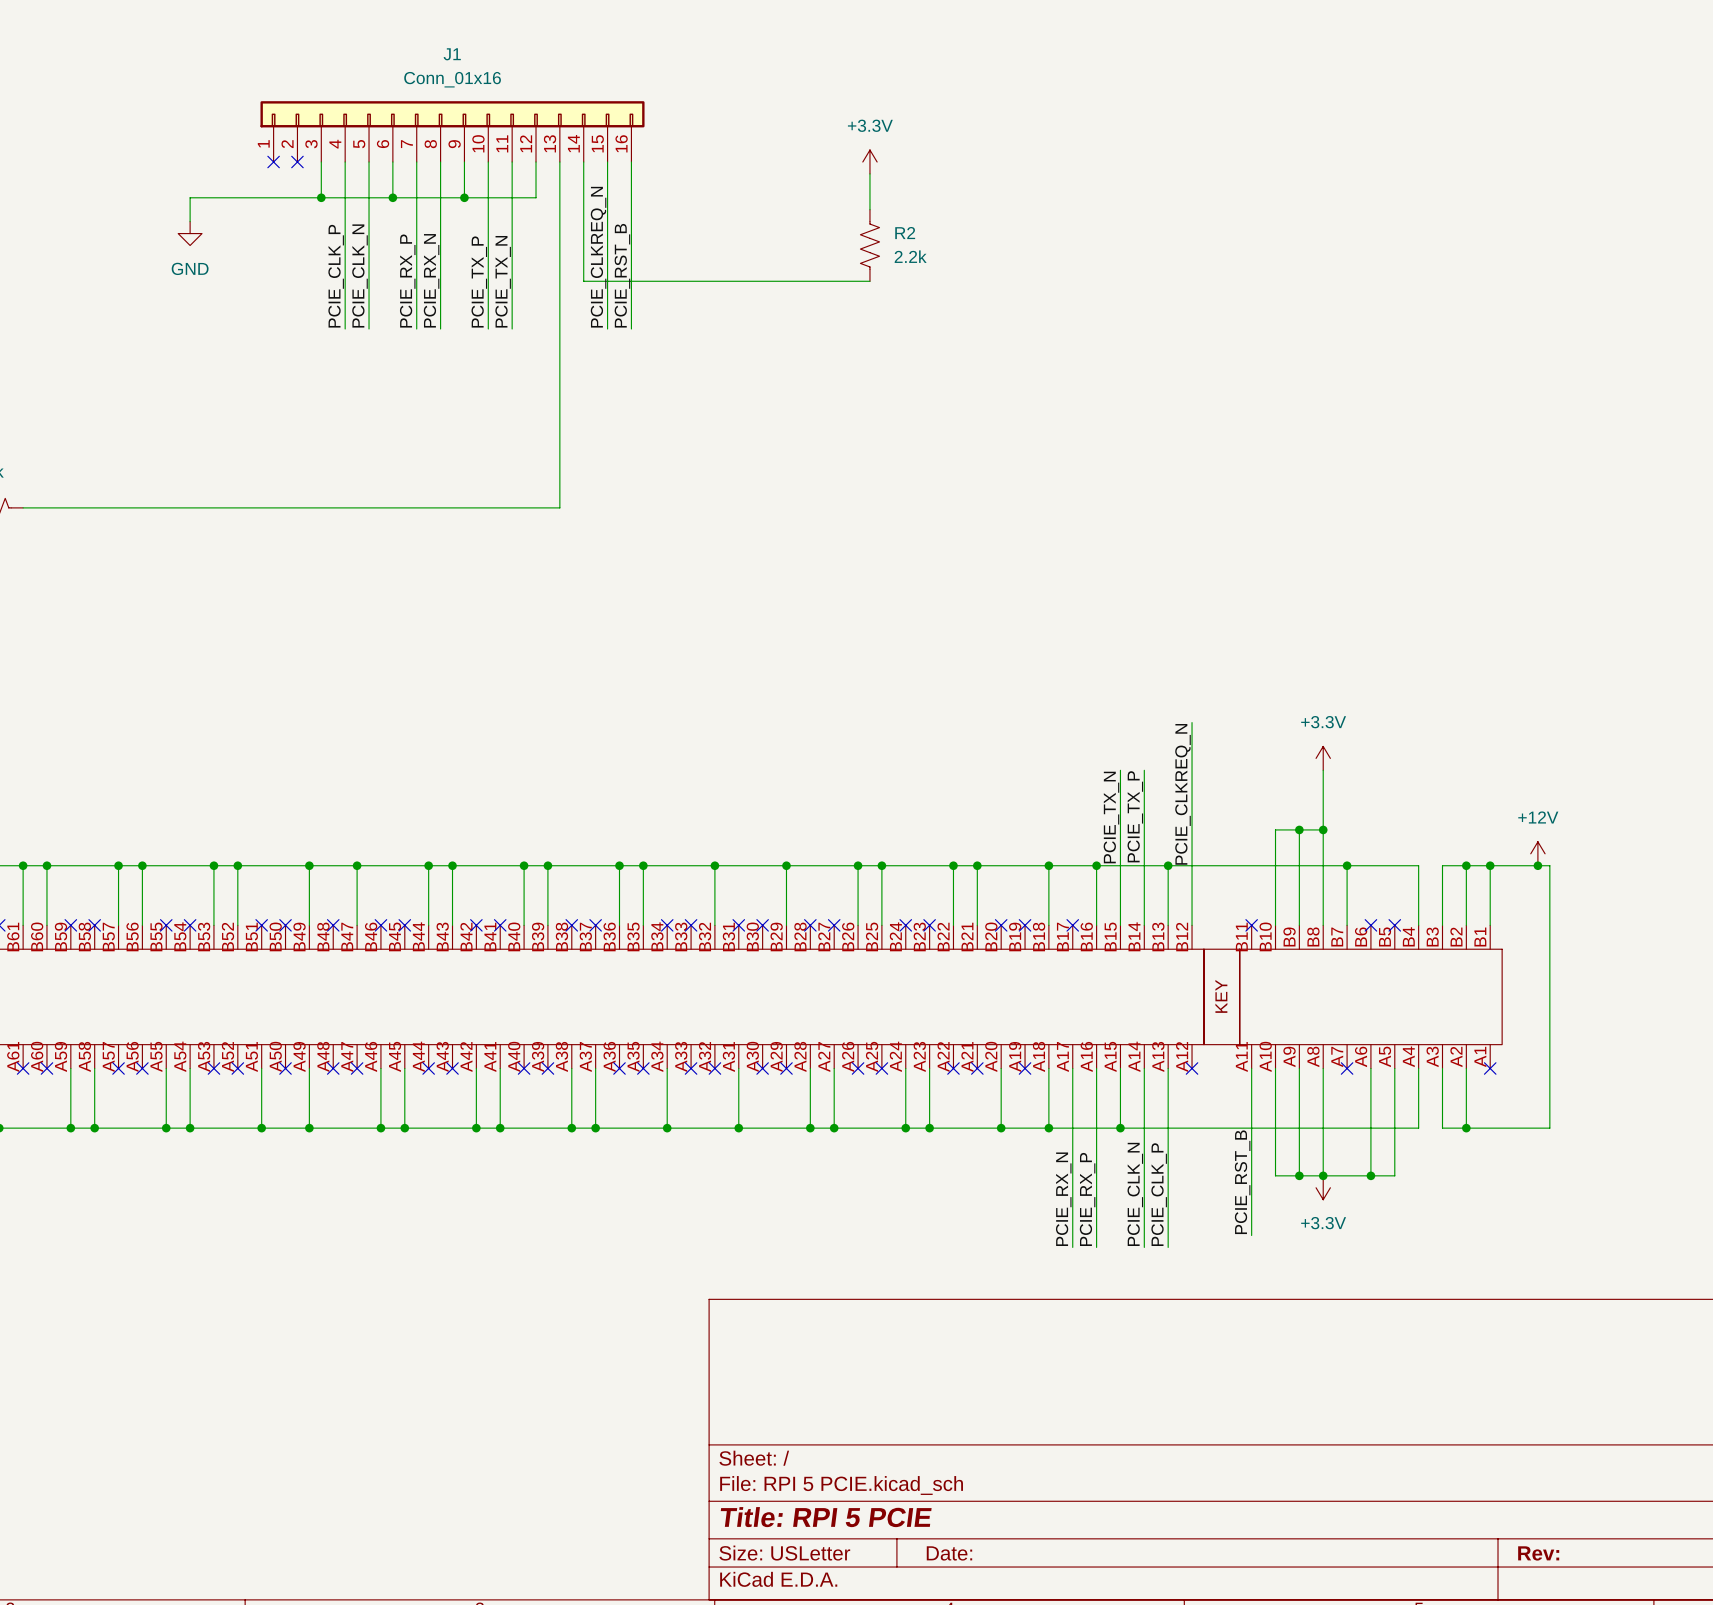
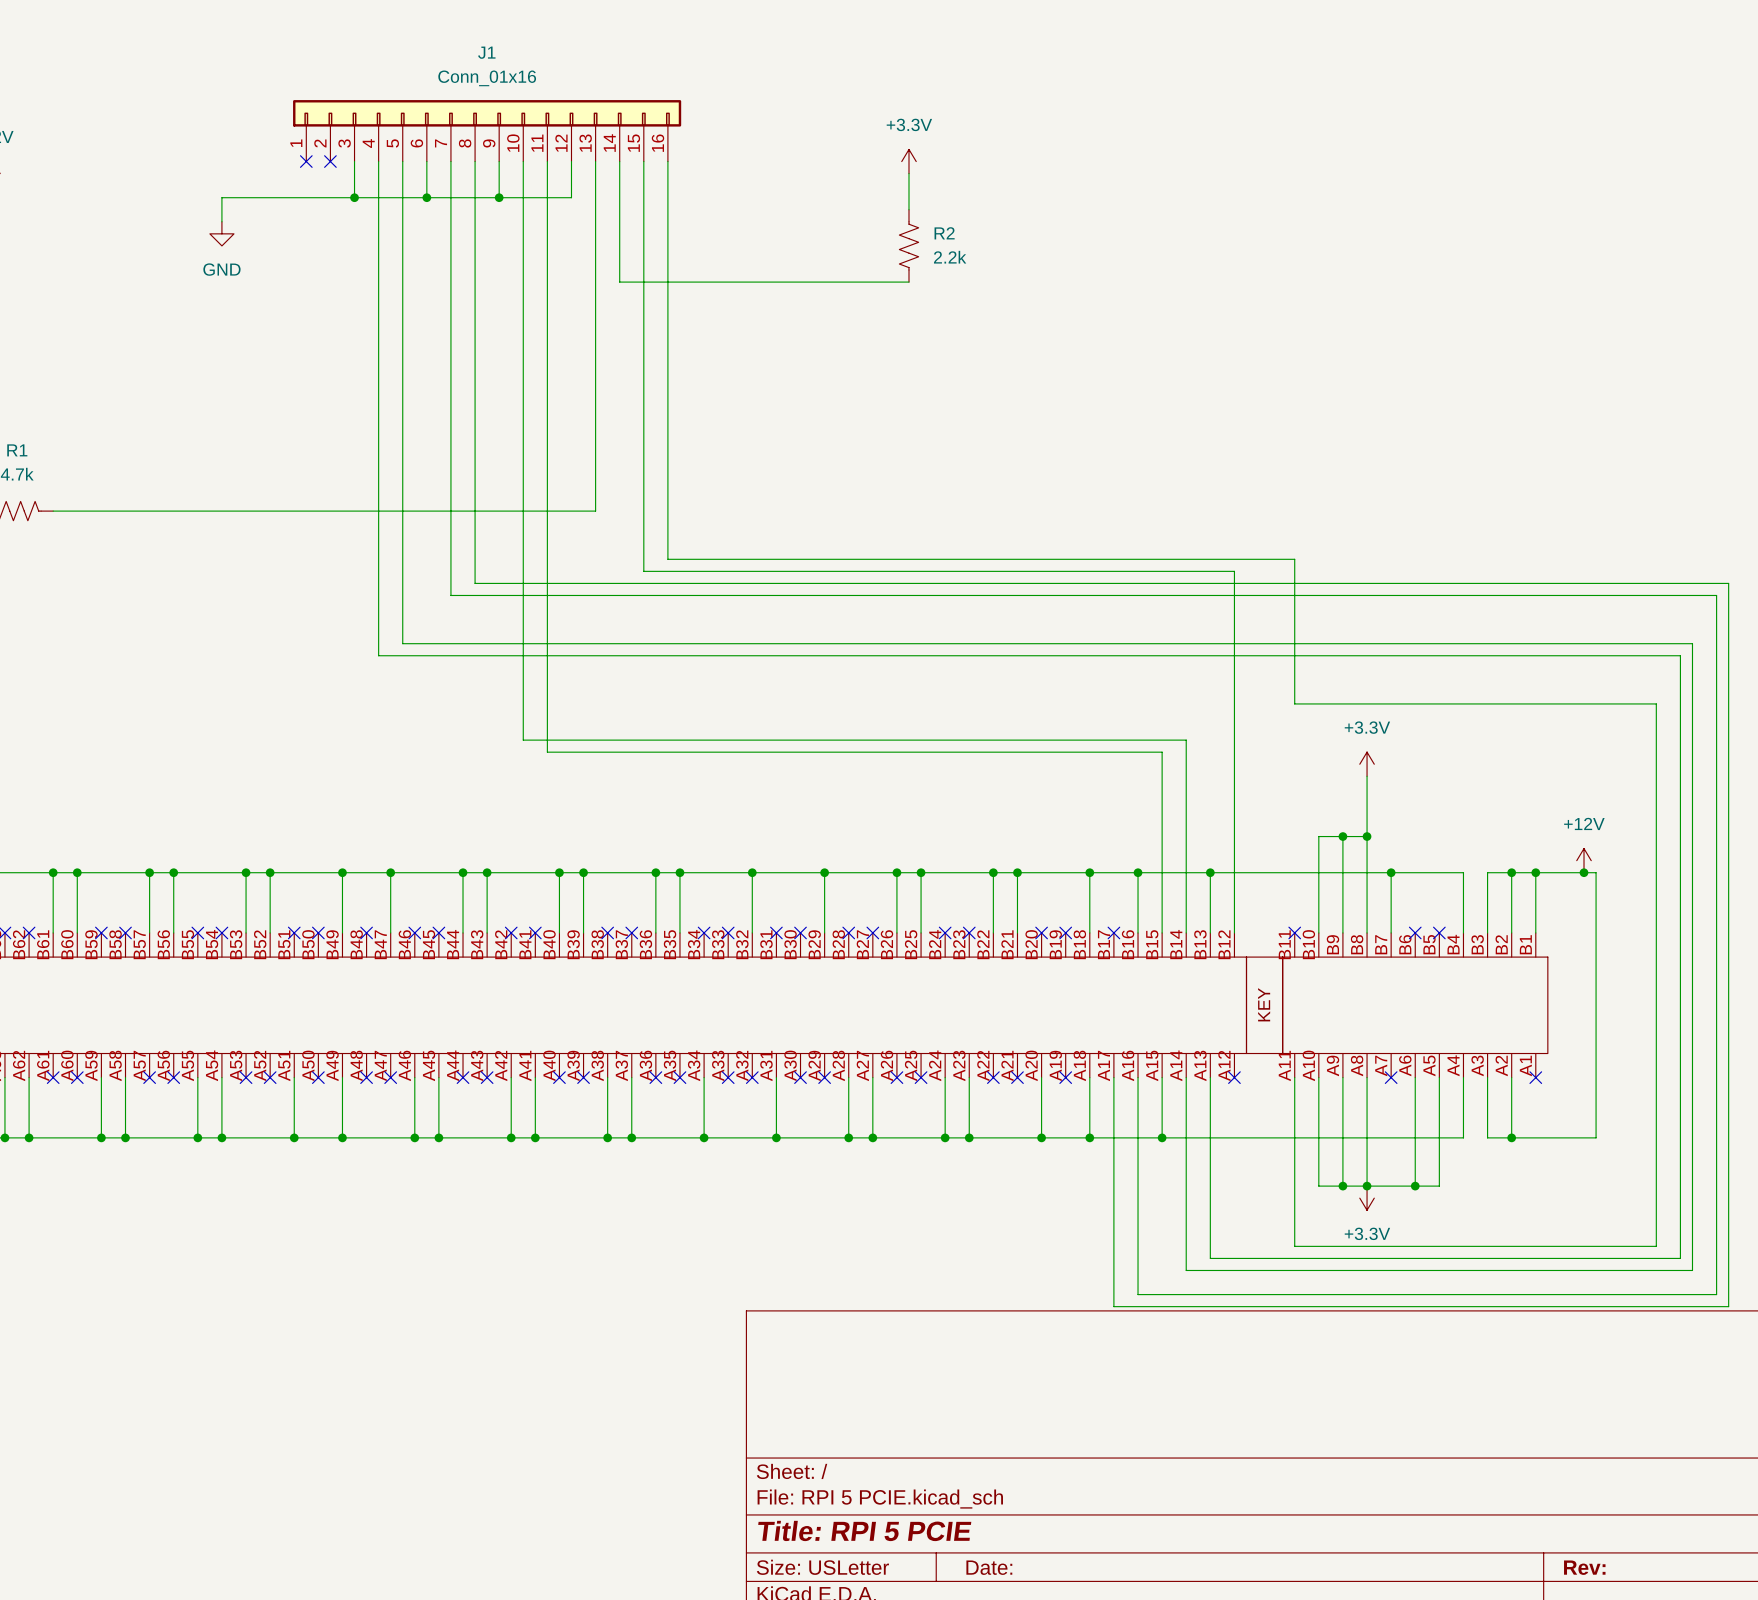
label: PCIE_CLKREQ_N (598, 257) -> none
label: PCIE_CLK_N (360, 275) -> none
label: PCIE_RST_B (622, 275) -> none
label: PCIE_CLK_P (336, 276) -> none
label: PCIE_RX_N (431, 280) -> none
label: PCIE_RX_P (407, 281) -> none
label: PCIE_TX_N (503, 281) -> none
label: PCIE_TX_P (479, 282) -> none
wire: none -> (378, 330) (378, 655) (1680, 655) (1680, 1258) (1210, 1258)
wire: none -> (402, 330) (402, 643) (1692, 643) (1692, 1270) (1186, 1270) (1186, 1258)
wire: none -> (450, 330) (450, 595) (1716, 595) (1716, 1294) (1138, 1294) (1138, 1258)
wire: none -> (475, 330) (475, 583) (1728, 583) (1728, 1306) (1113, 1306) (1113, 1258)
wire: none -> (523, 330) (523, 740) (1186, 740) (1186, 776)
wire: none -> (547, 330) (547, 752) (1162, 752) (1162, 776)
wire: none -> (643, 330) (643, 571) (1234, 571) (1234, 728)
wire: none -> (667, 330) (667, 559) (1294, 559) (1294, 703) (1656, 703) (1656, 1246) (1294, 1246)
label: PCIE_CLKREQ_N (1183, 794) -> none
label: PCIE_TX_P (1135, 816) -> none
label: PCIE_TX_N (1111, 817) -> none
label: PCIE_RST_B (1242, 1182) -> none
label: PCIE_CLK_N (1135, 1194) -> none
label: PCIE_CLK_P (1159, 1194) -> none
label: PCIE_RX_N (1063, 1199) -> none
label: PCIE_RX_P (1087, 1199) -> none

